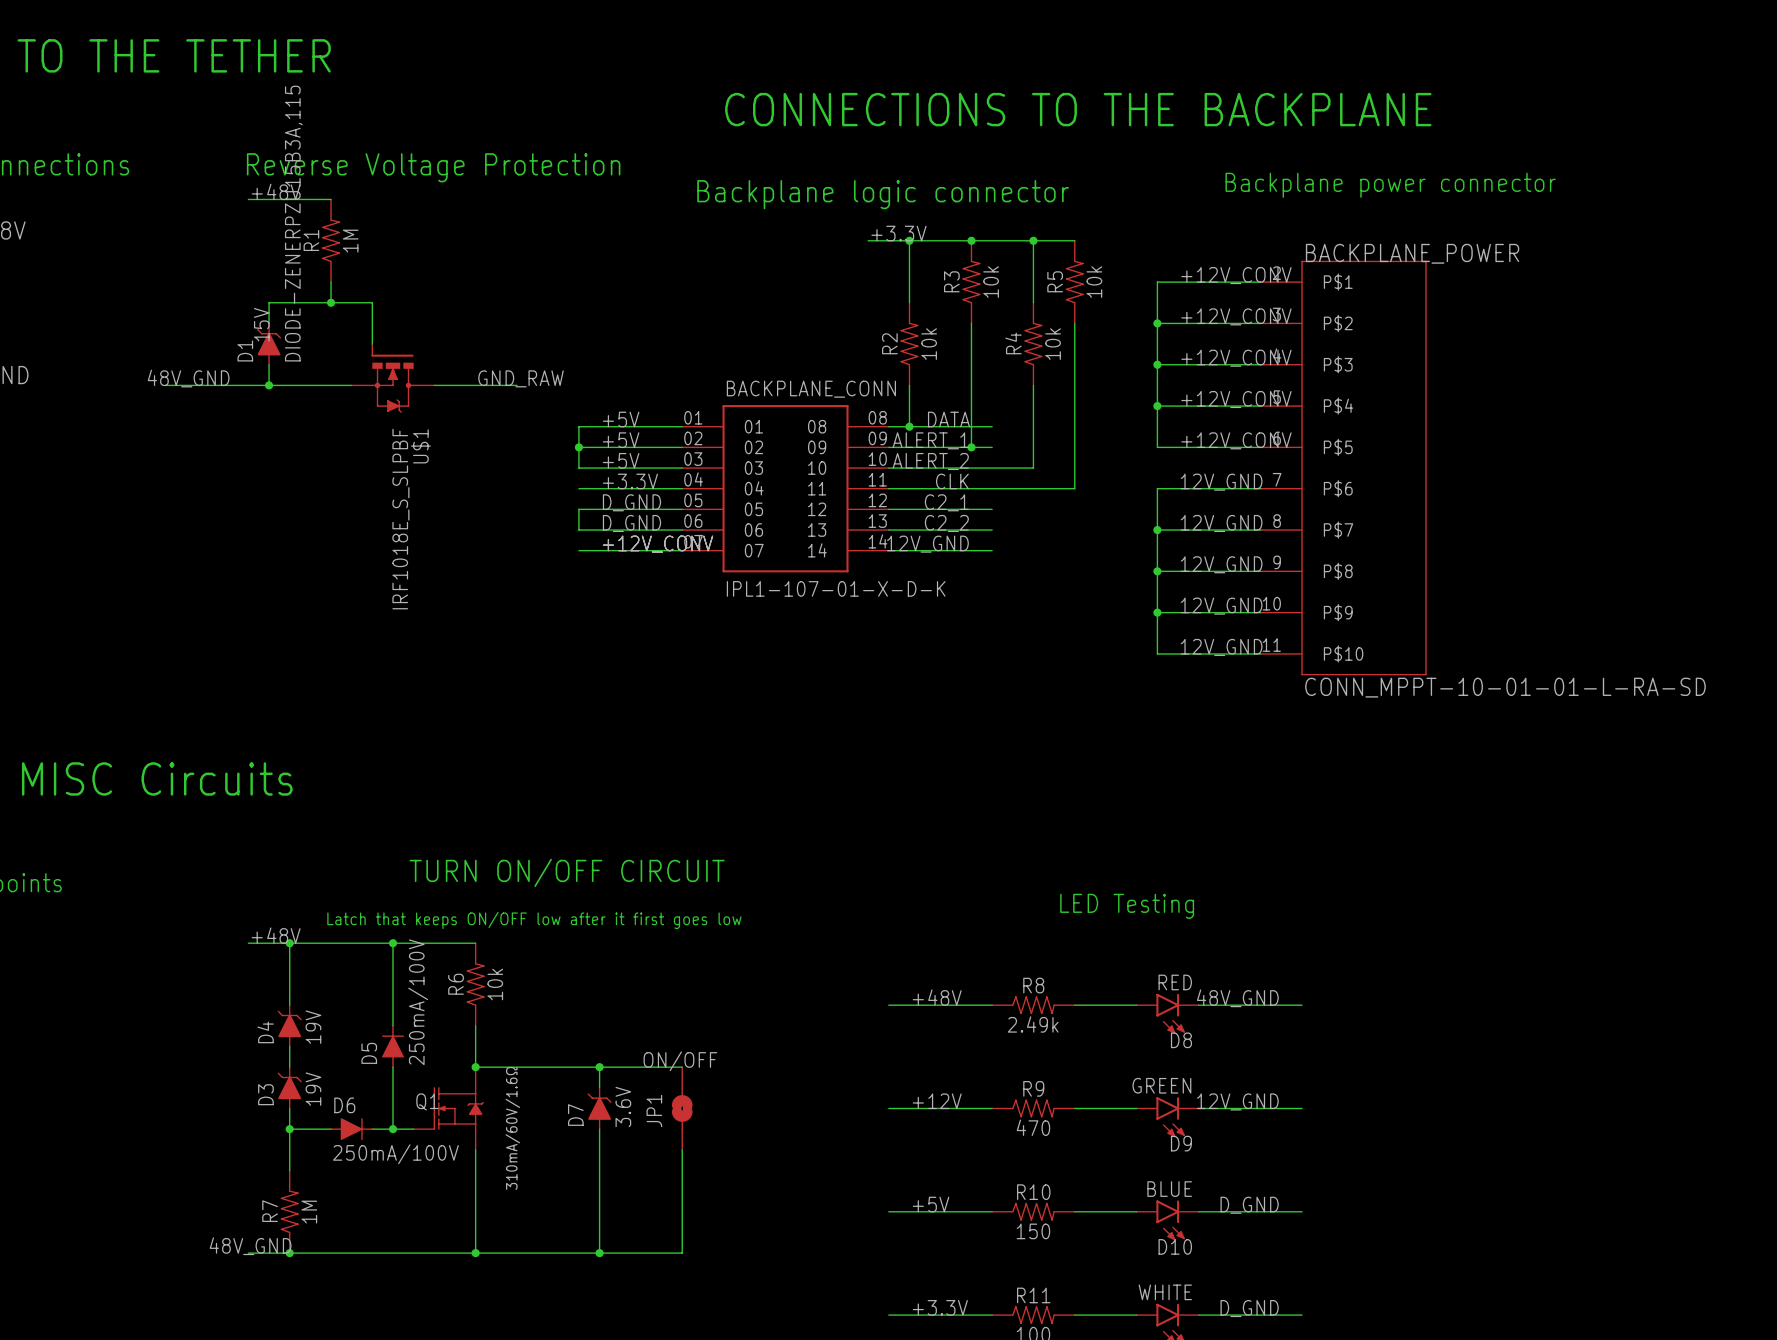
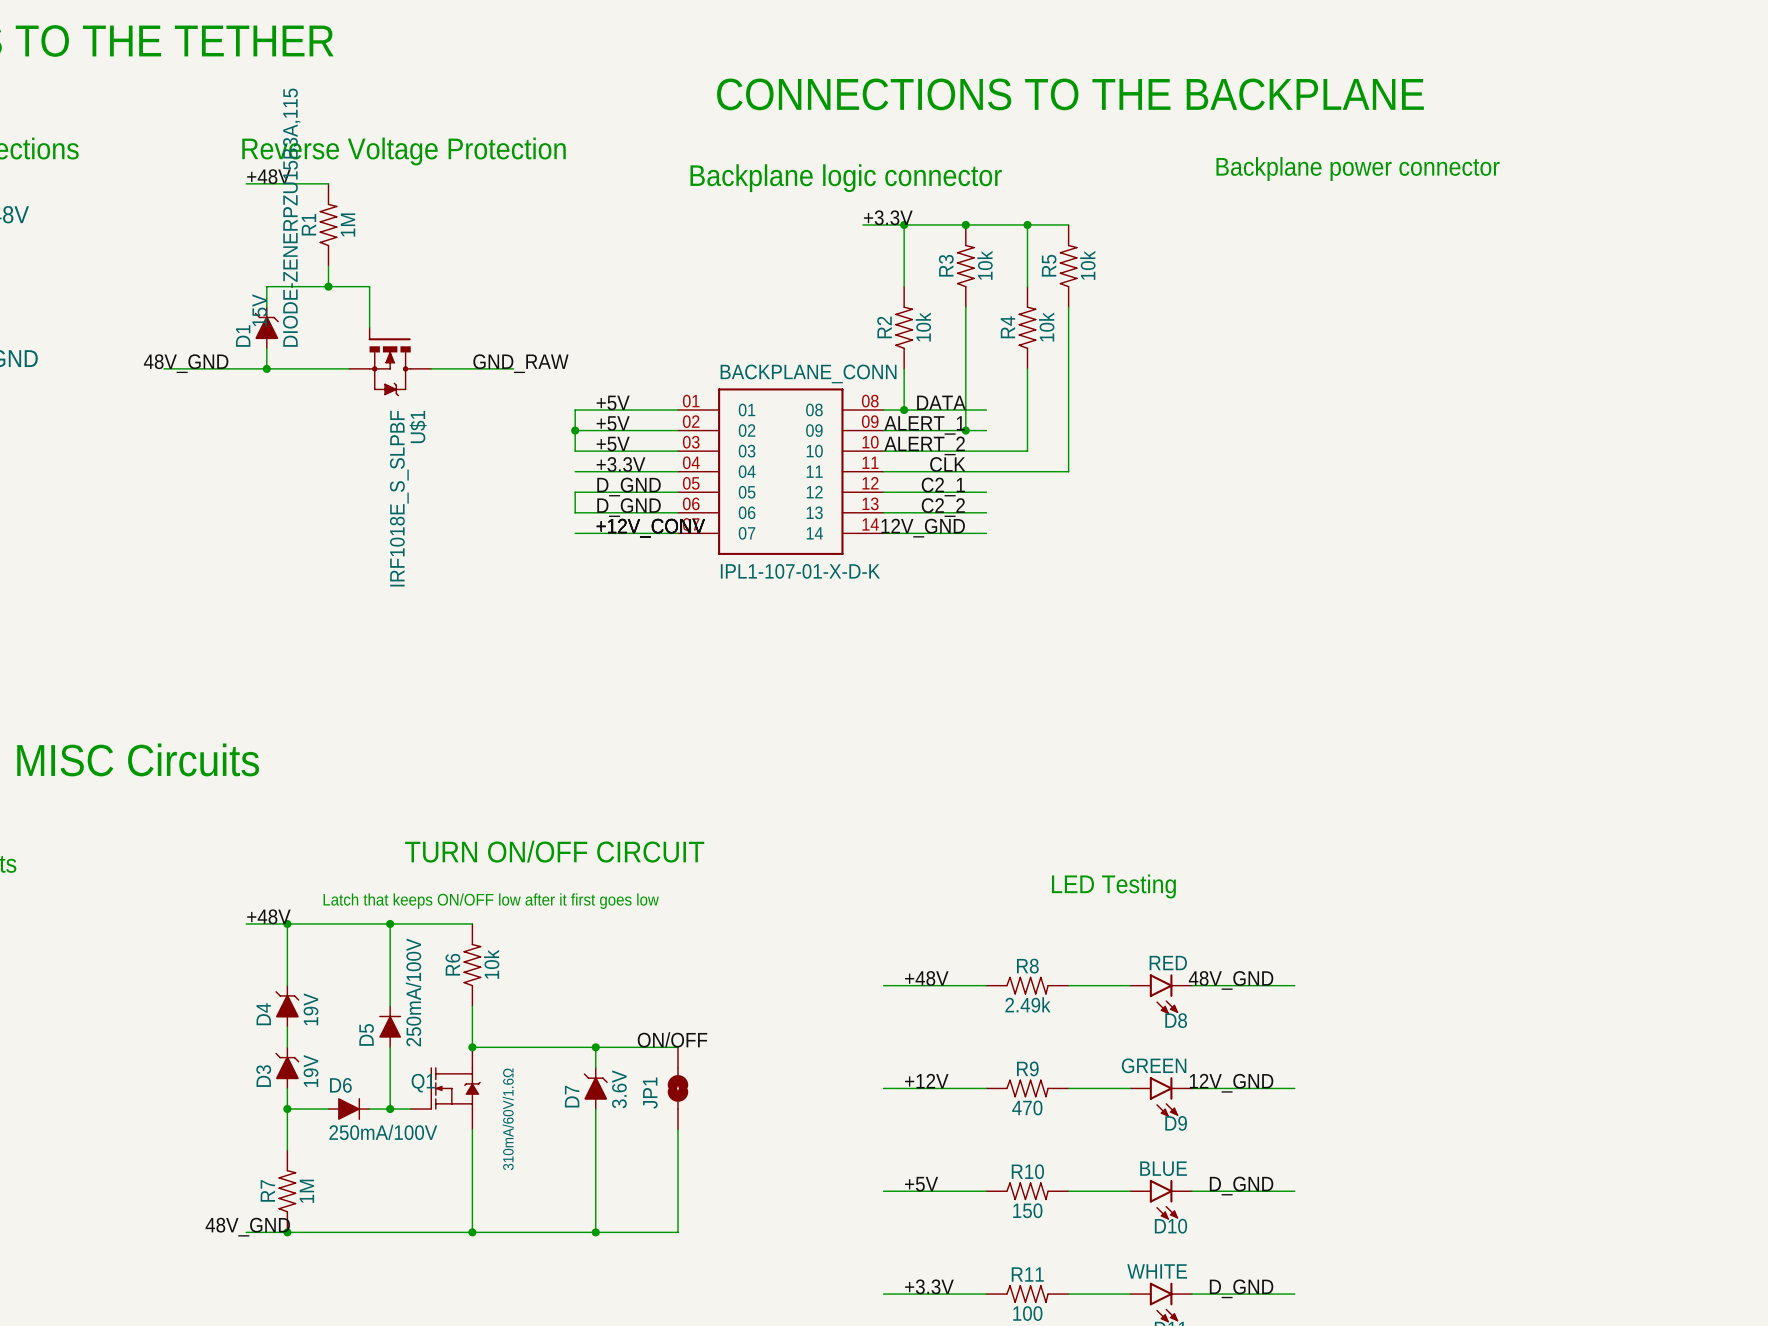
label: +12V_CONV (1236, 275) -> none
wire: (1260, 282) (1157, 282) (1157, 447) (1260, 447) -> none
label: +12V_CONV (1236, 316) -> none
wire: (1157, 323) (1260, 323) -> none
junction: (1157, 323) -> none
label: +12V_CONV (1236, 358) -> none
wire: (1157, 364) (1260, 364) -> none
junction: (1157, 364) -> none
label: +12V_CONV (1236, 399) -> none
wire: (1157, 406) (1260, 406) -> none
junction: (1157, 406) -> none
label: +12V_CONV (1236, 440) -> none
BACKPLANE_POWER: CONN_MPPT-10-01-01-L-RA-SD (1343, 468) -> none
label: 12V_GND (1221, 482) -> none
wire: (1260, 488) (1157, 488) (1157, 653) (1260, 653) -> none
label: 12V_GND (1221, 523) -> none
wire: (1157, 530) (1260, 530) -> none
junction: (1157, 530) -> none
label: 12V_GND (1221, 564) -> none
wire: (1157, 571) (1260, 571) -> none
junction: (1157, 571) -> none
label: 12V_GND (1221, 606) -> none
wire: (1157, 612) (1260, 612) -> none
junction: (1157, 612) -> none
label: 12V_GND (1221, 647) -> none

